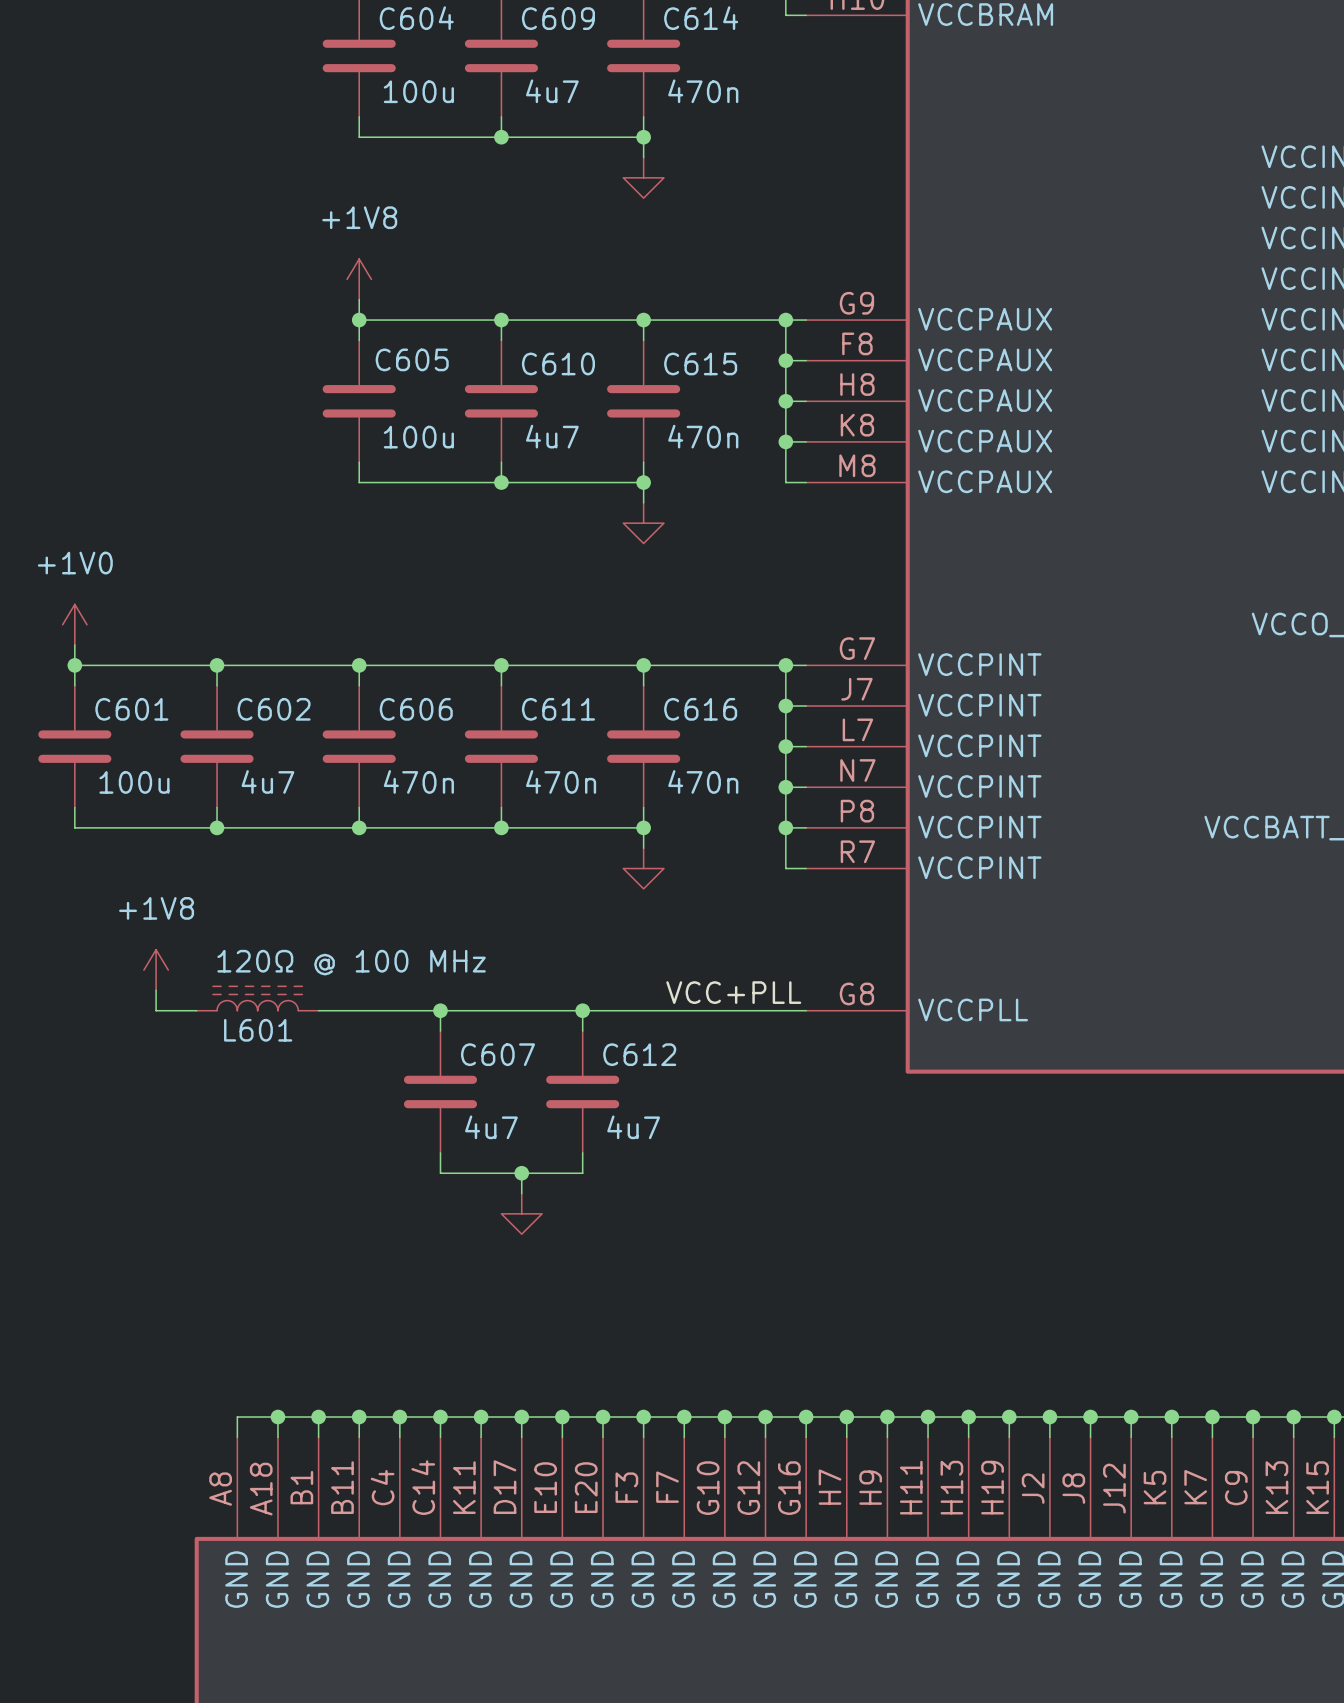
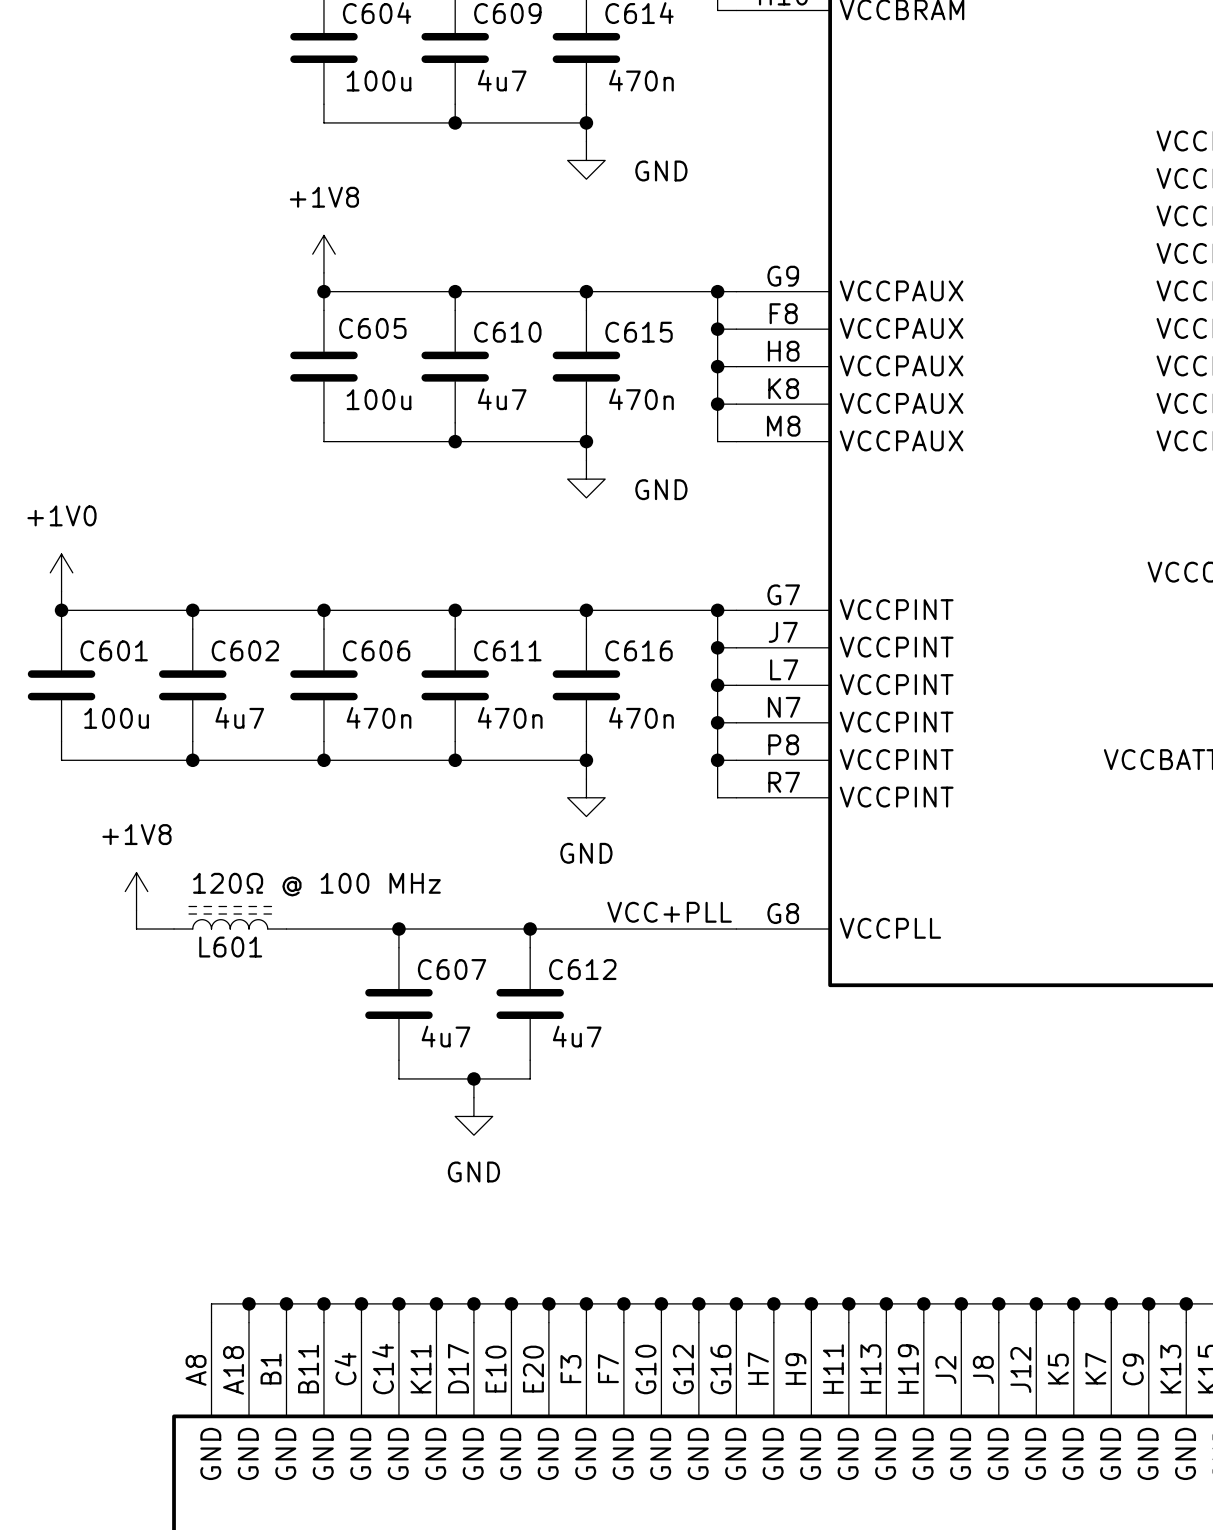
power symbol text: none -> GND (661, 170)
power symbol text: none -> GND (661, 489)
power symbol text: none -> GND (586, 853)
power symbol text: none -> GND (473, 1171)

